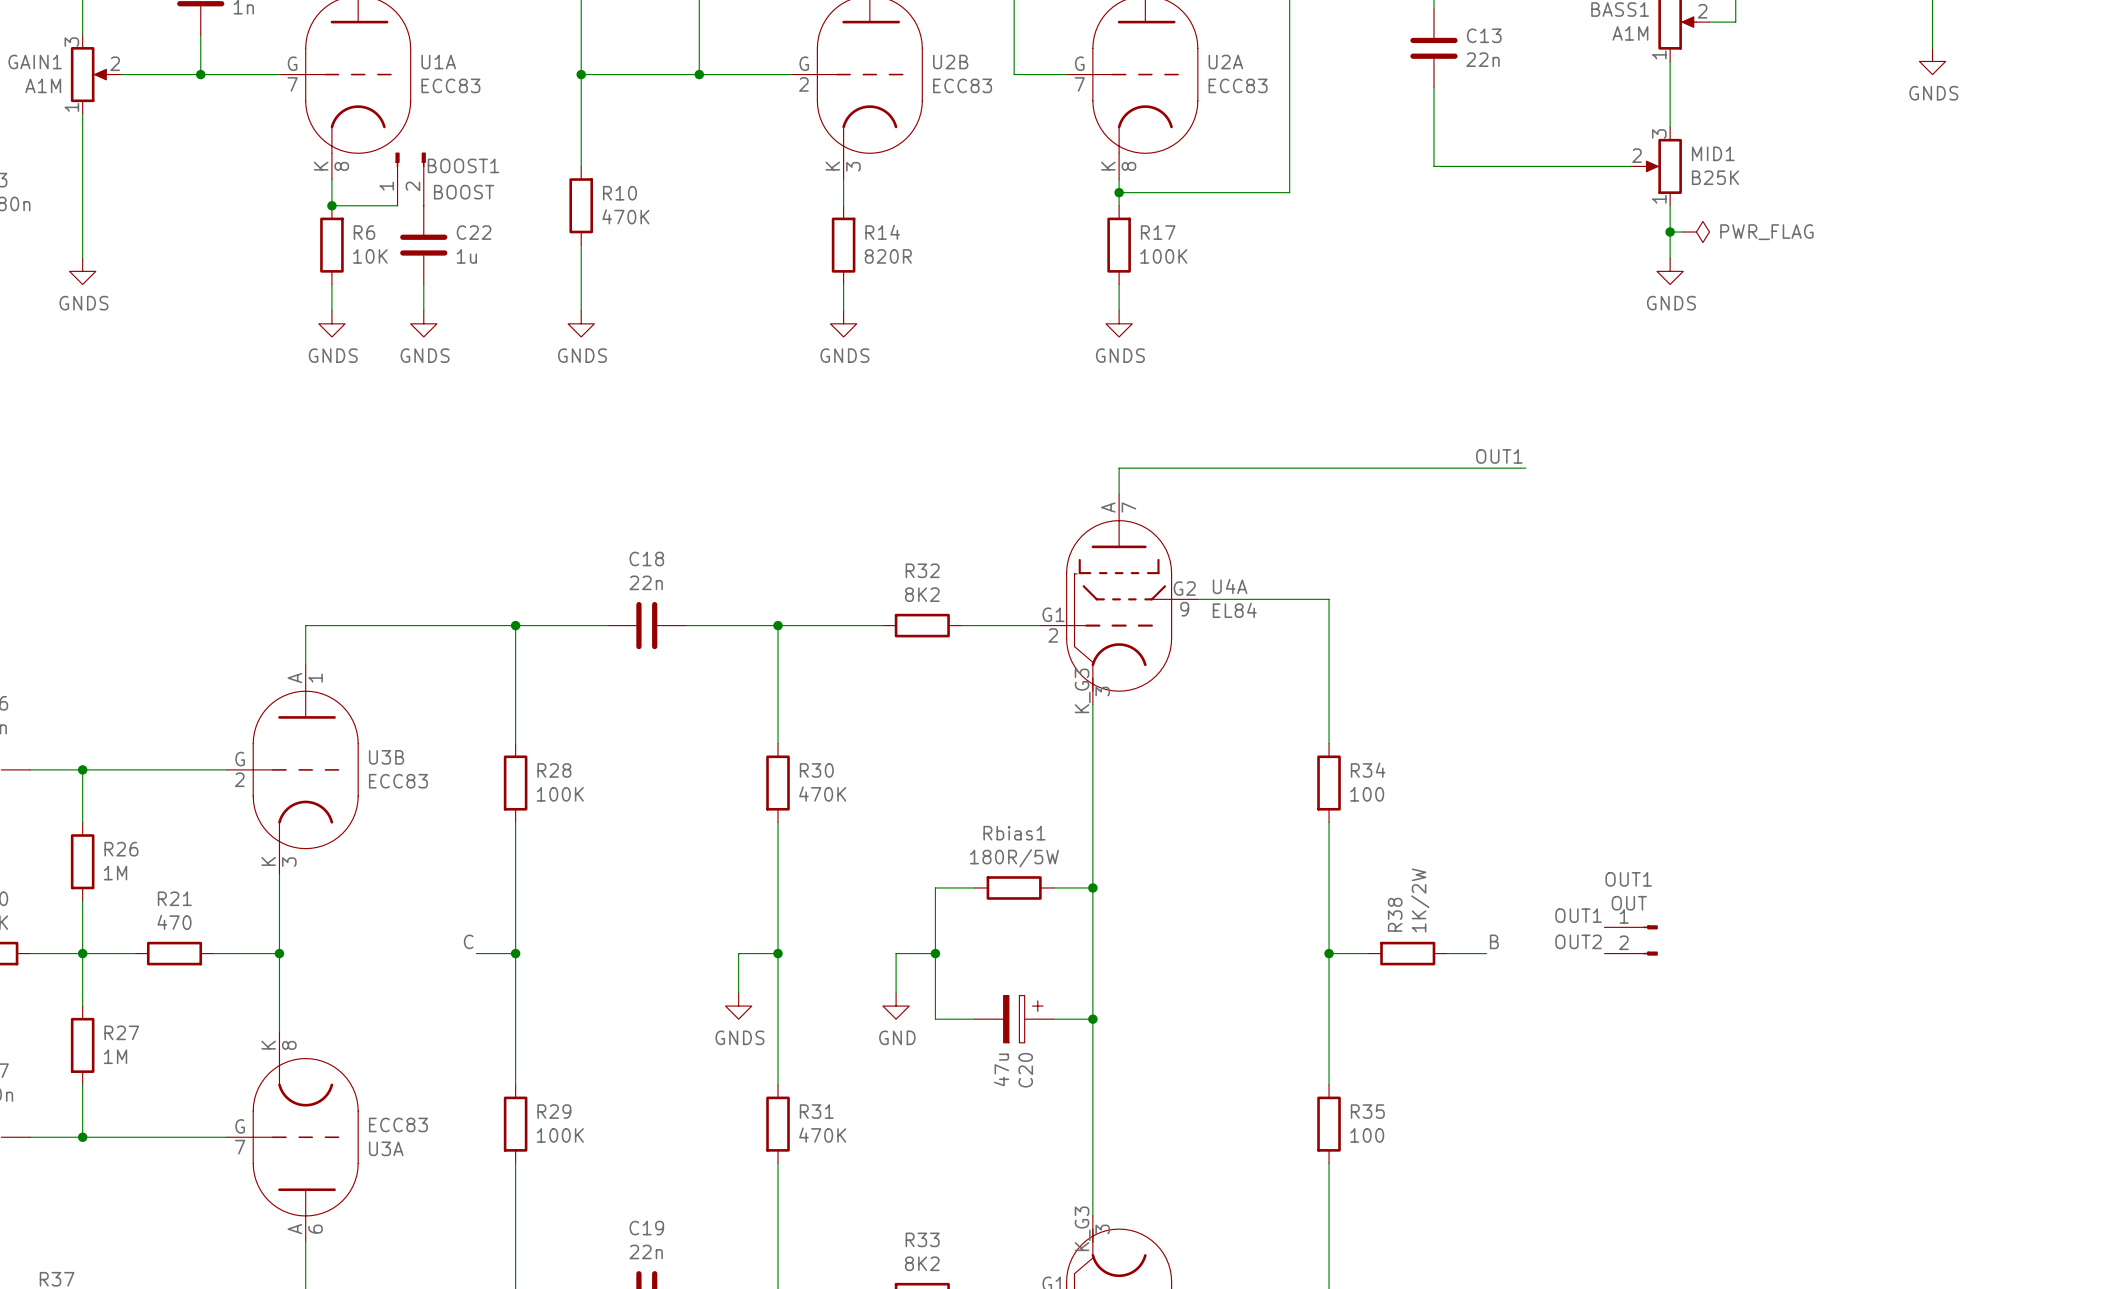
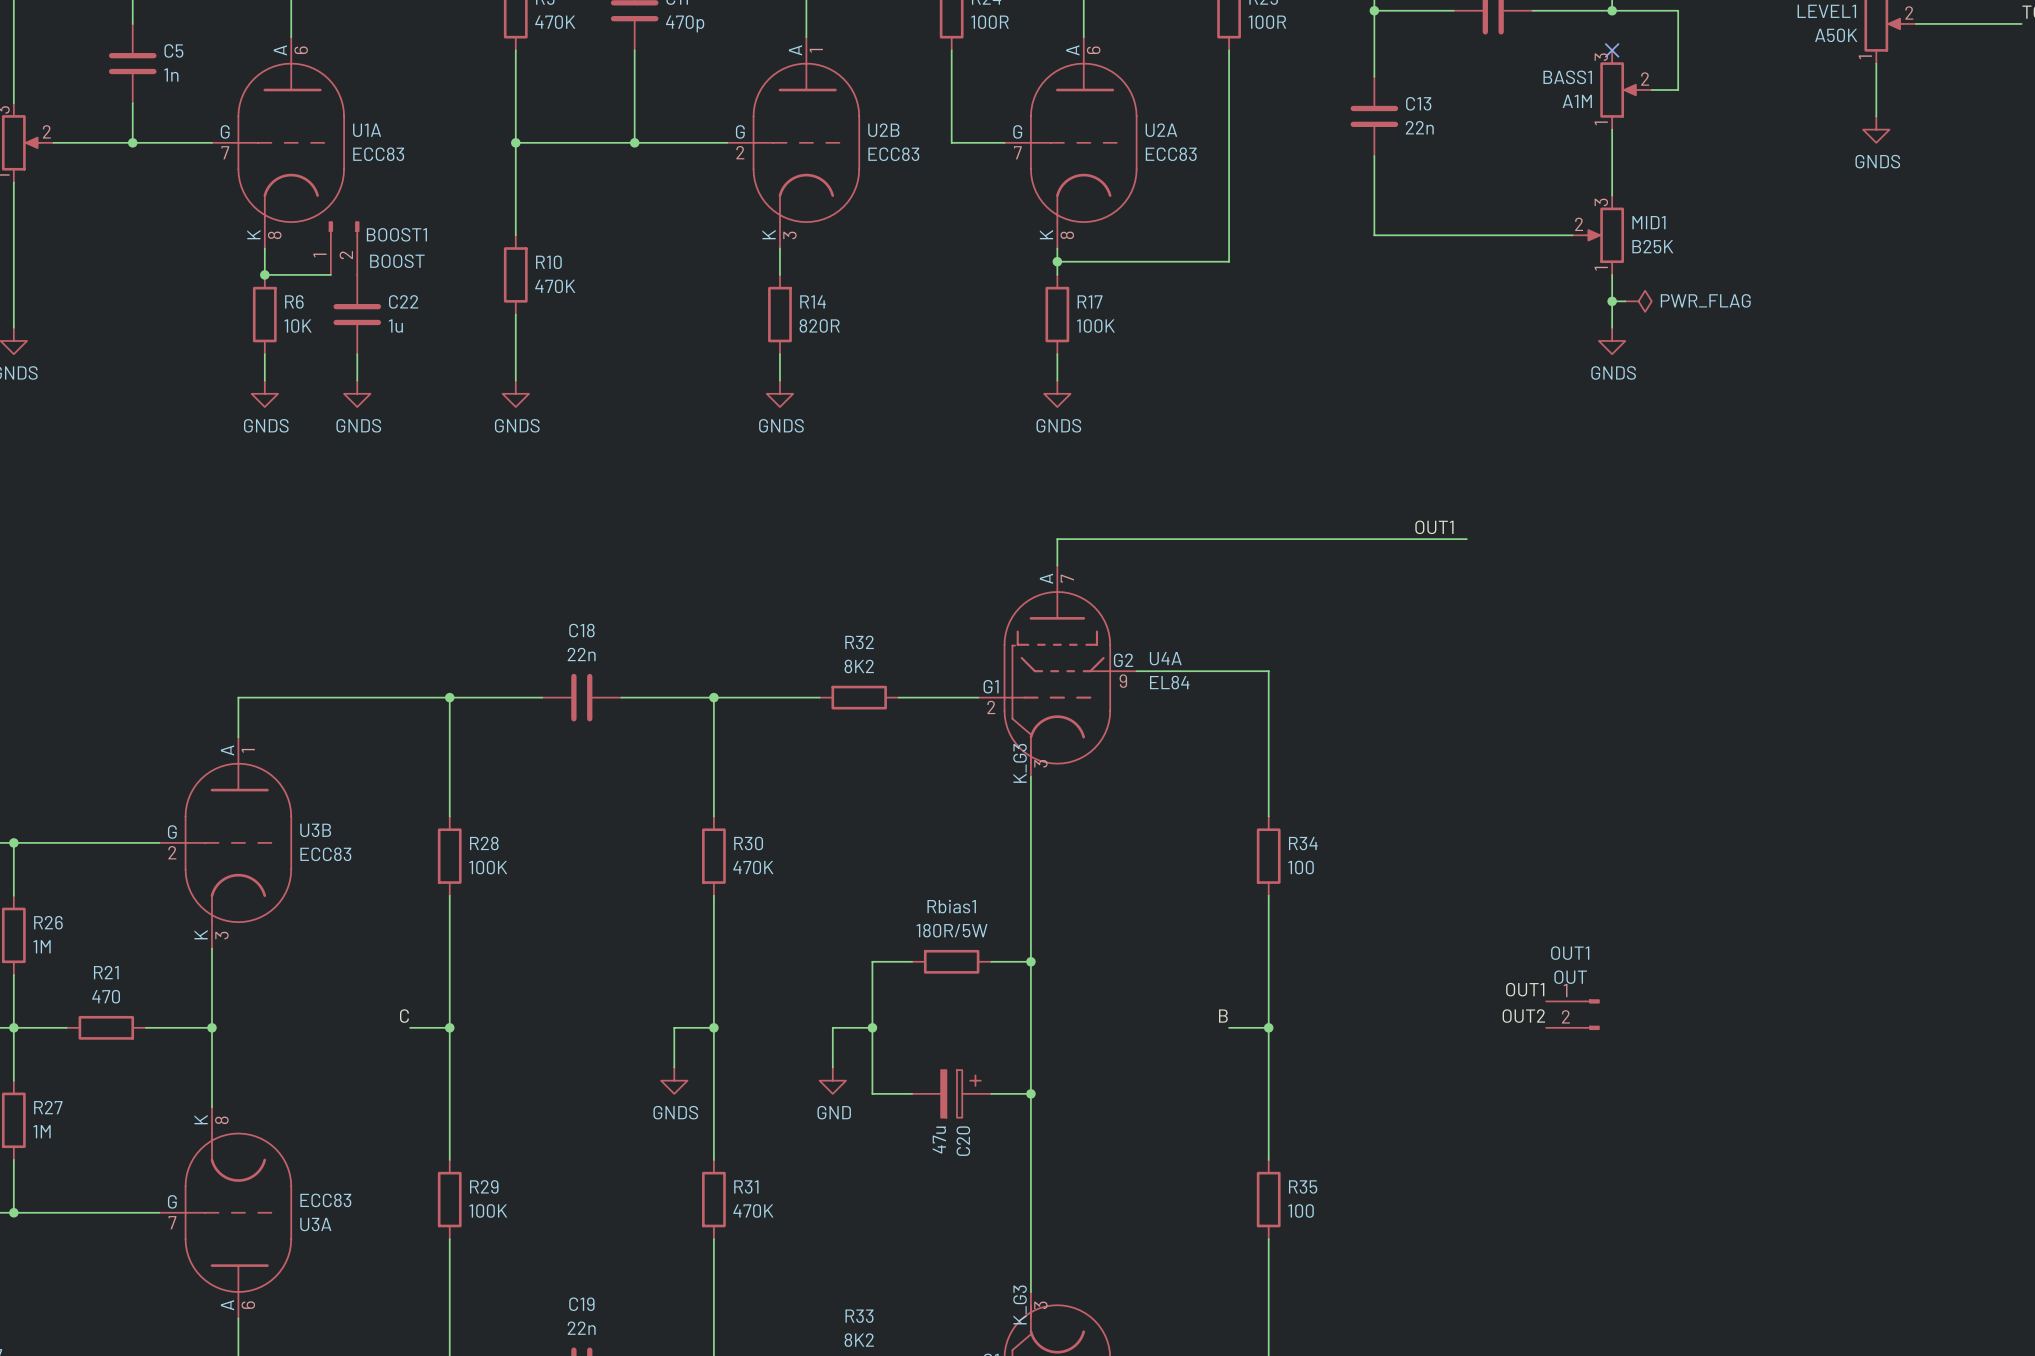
label position: B (1494, 941) -> B (1223, 1016)
wire: (1329, 953) (1368, 953) -> (1268, 1027) (1229, 1027)
R38: 1K/2W (1407, 953) -> none
wire: (1447, 953) (1486, 953) -> none

